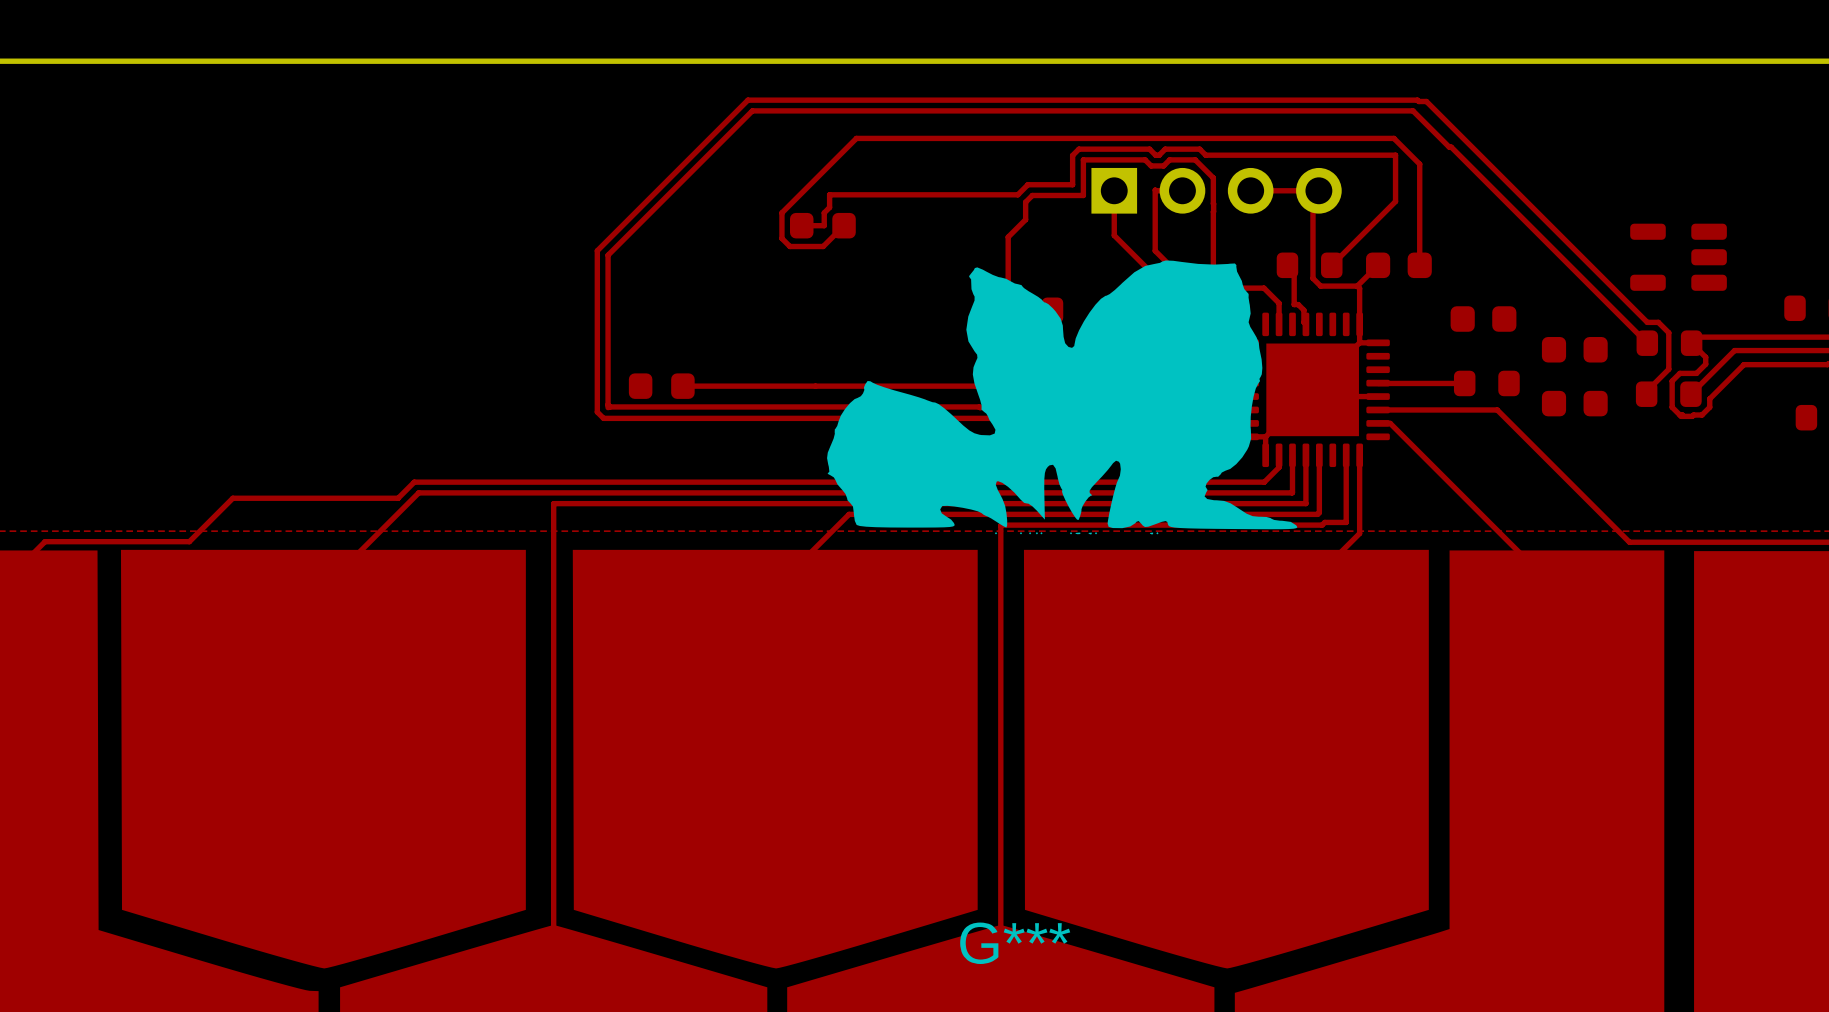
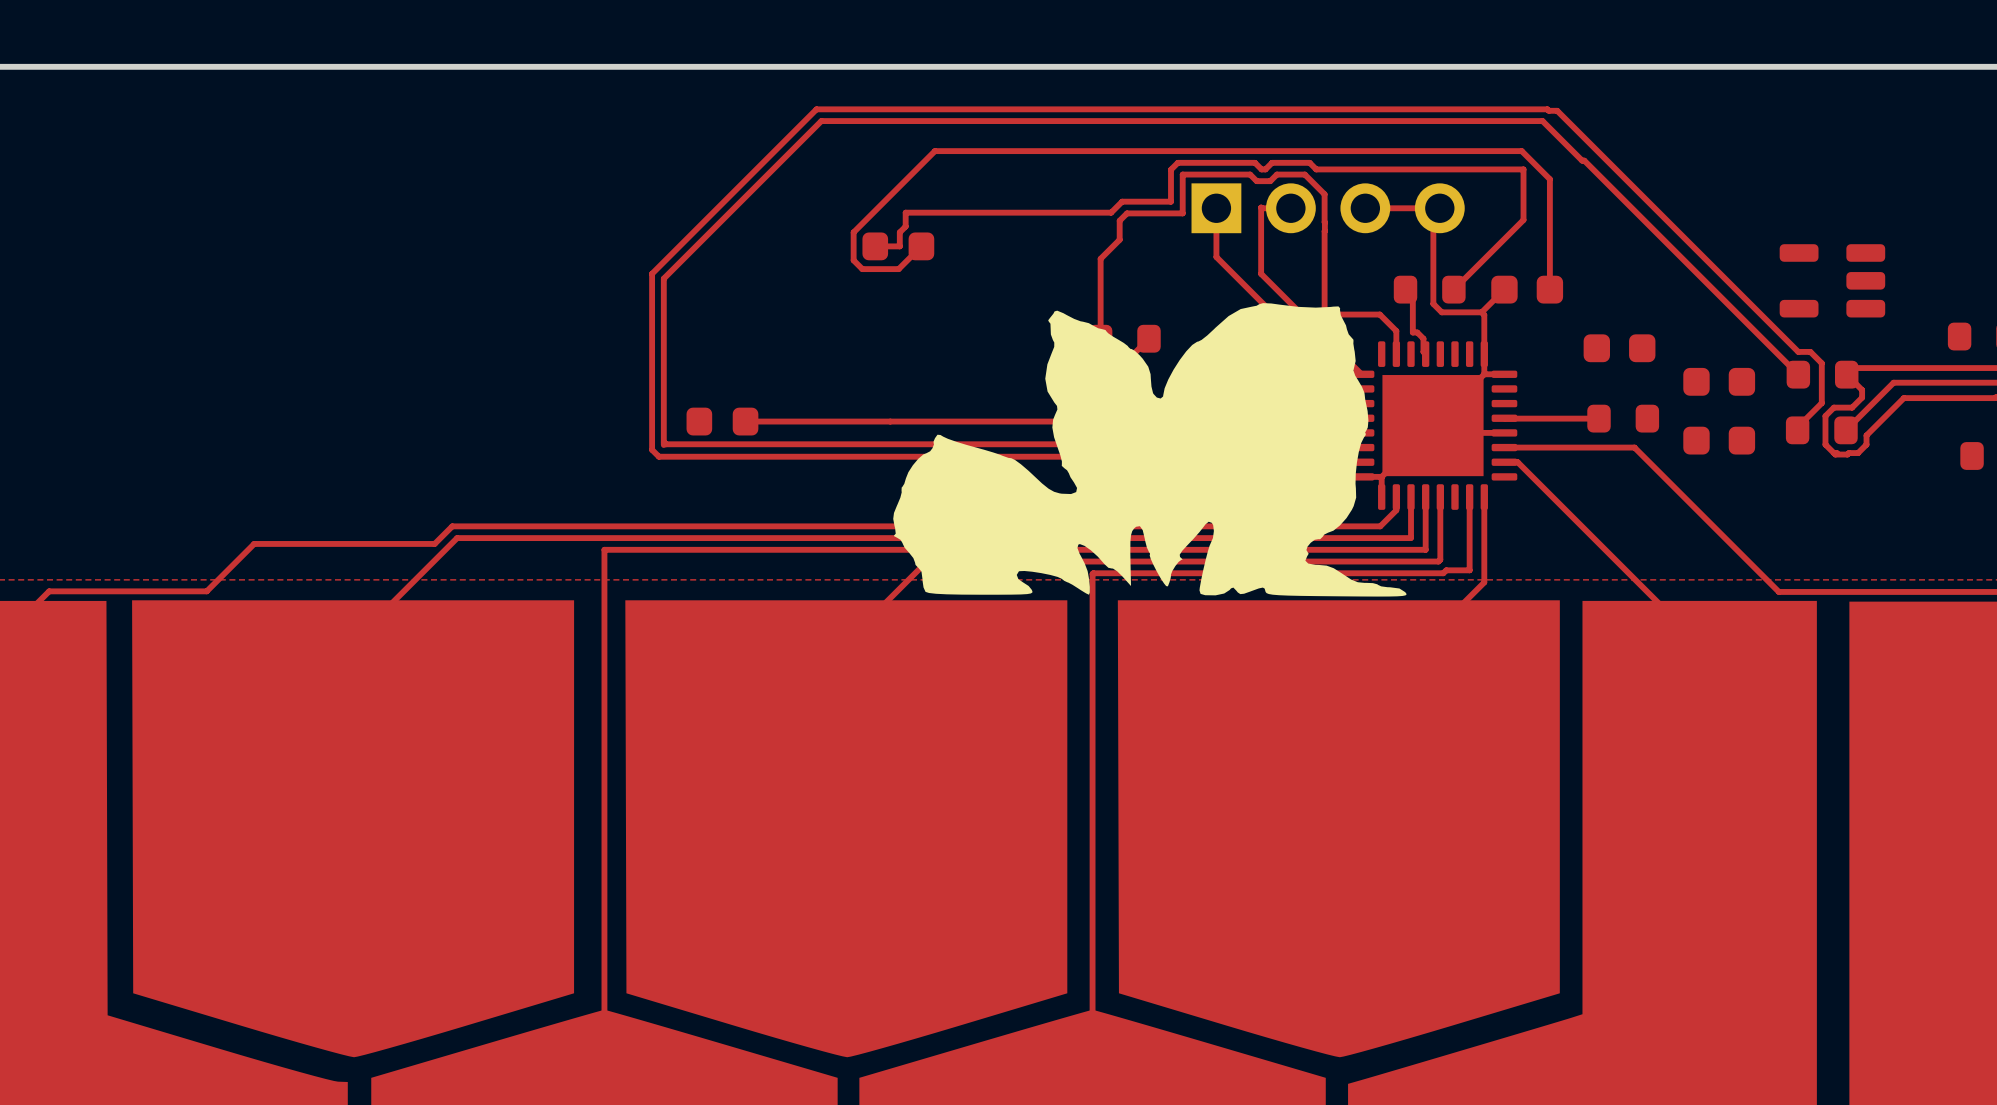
drawing: none -> [893, 303, 1407, 597]
G***: (1062, 397) -> none

